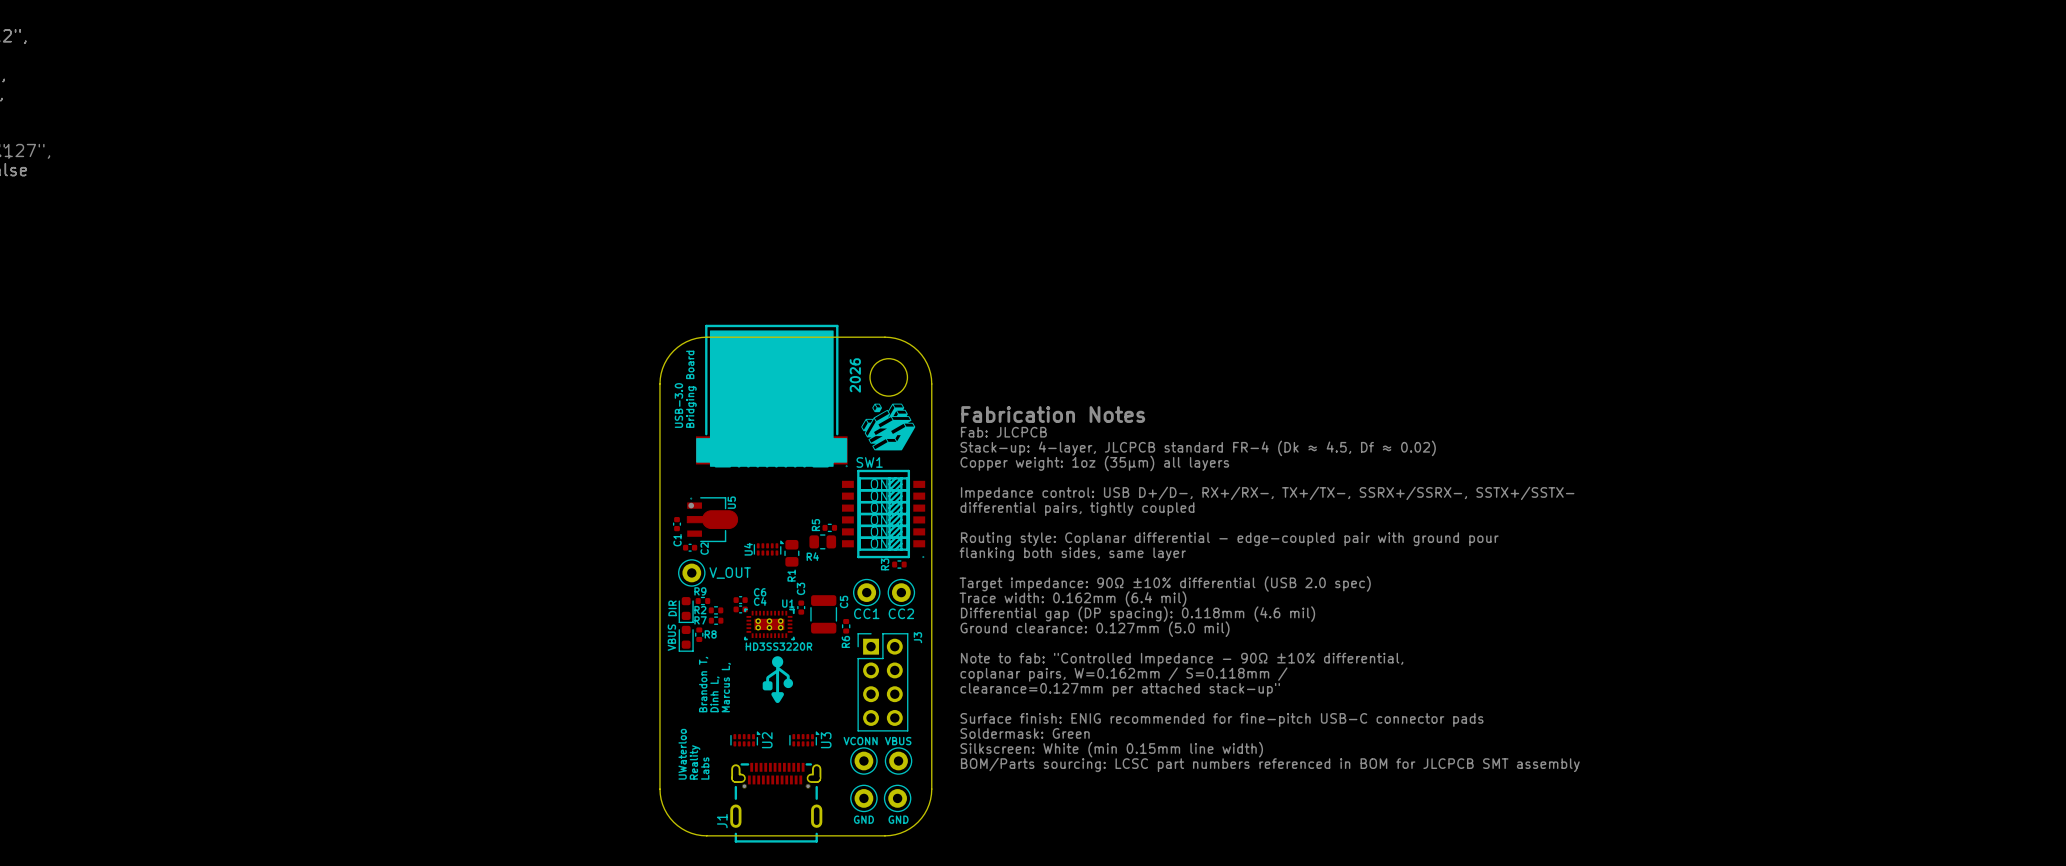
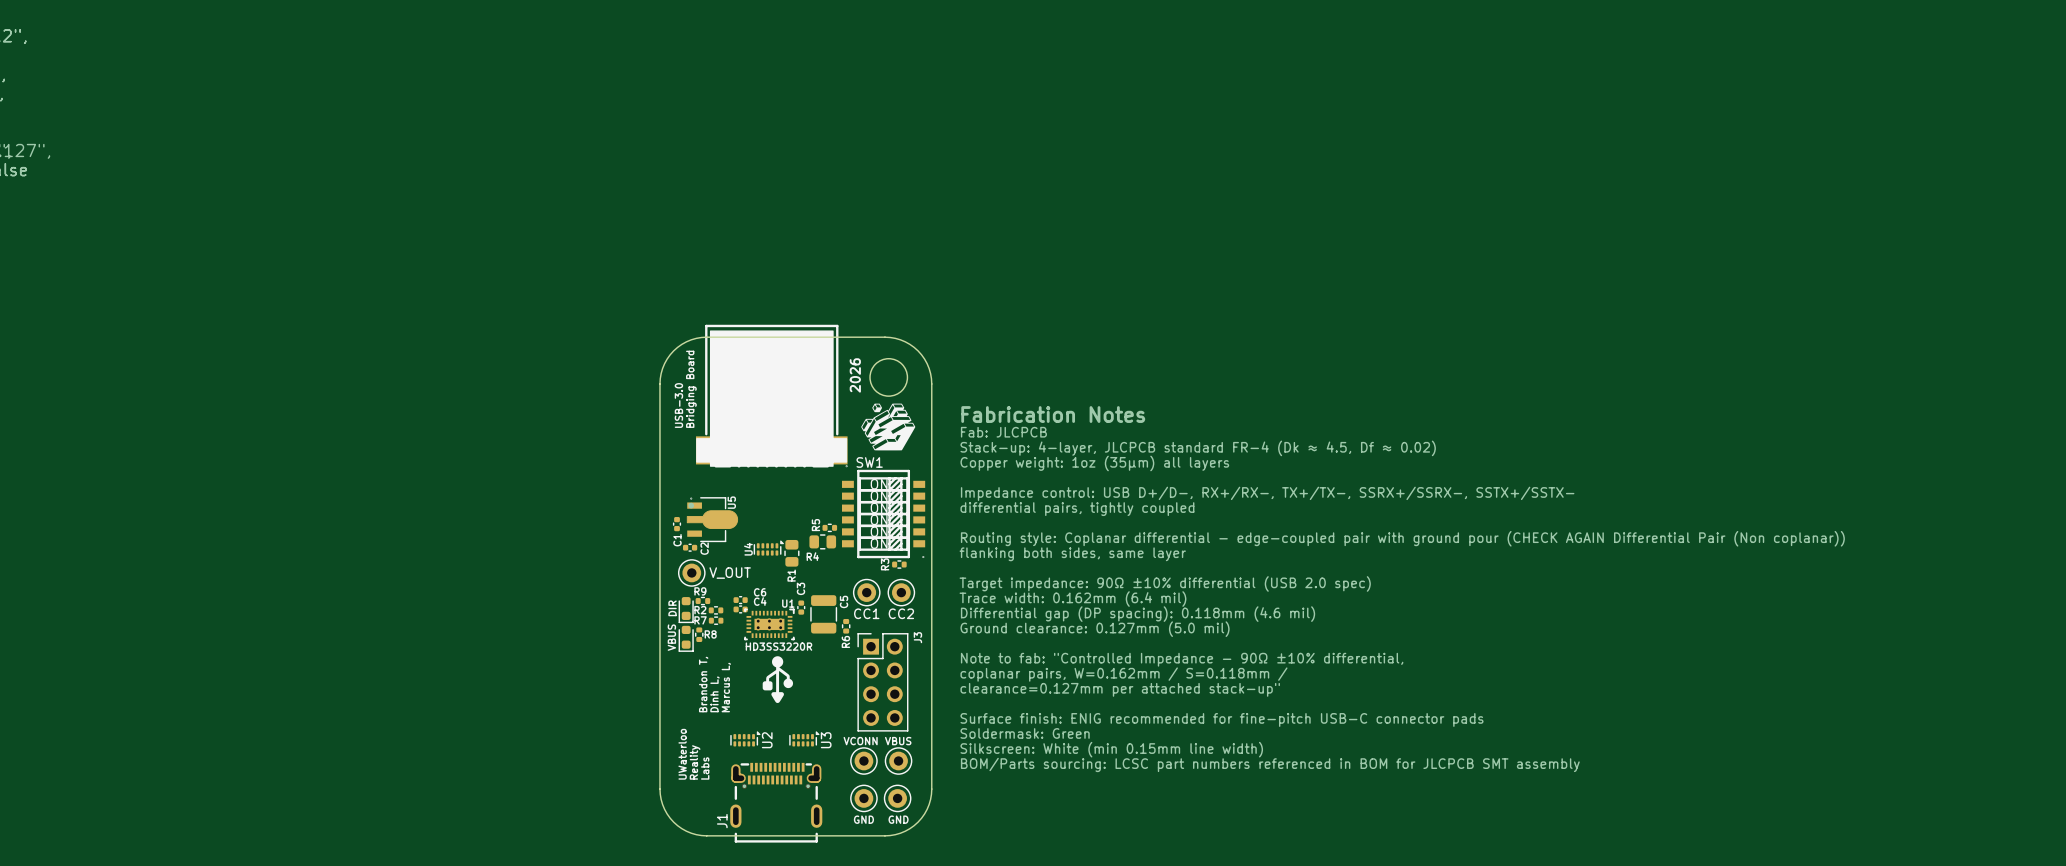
text: Routing style: Coplanar differential - edge-coupled pair with ground pour (1229, 539) -> Routing style: Coplanar differential - edge-coupled pair with ground pour (CHECK AGAIN Differential Pair (Non coplanar)) (1402, 538)

